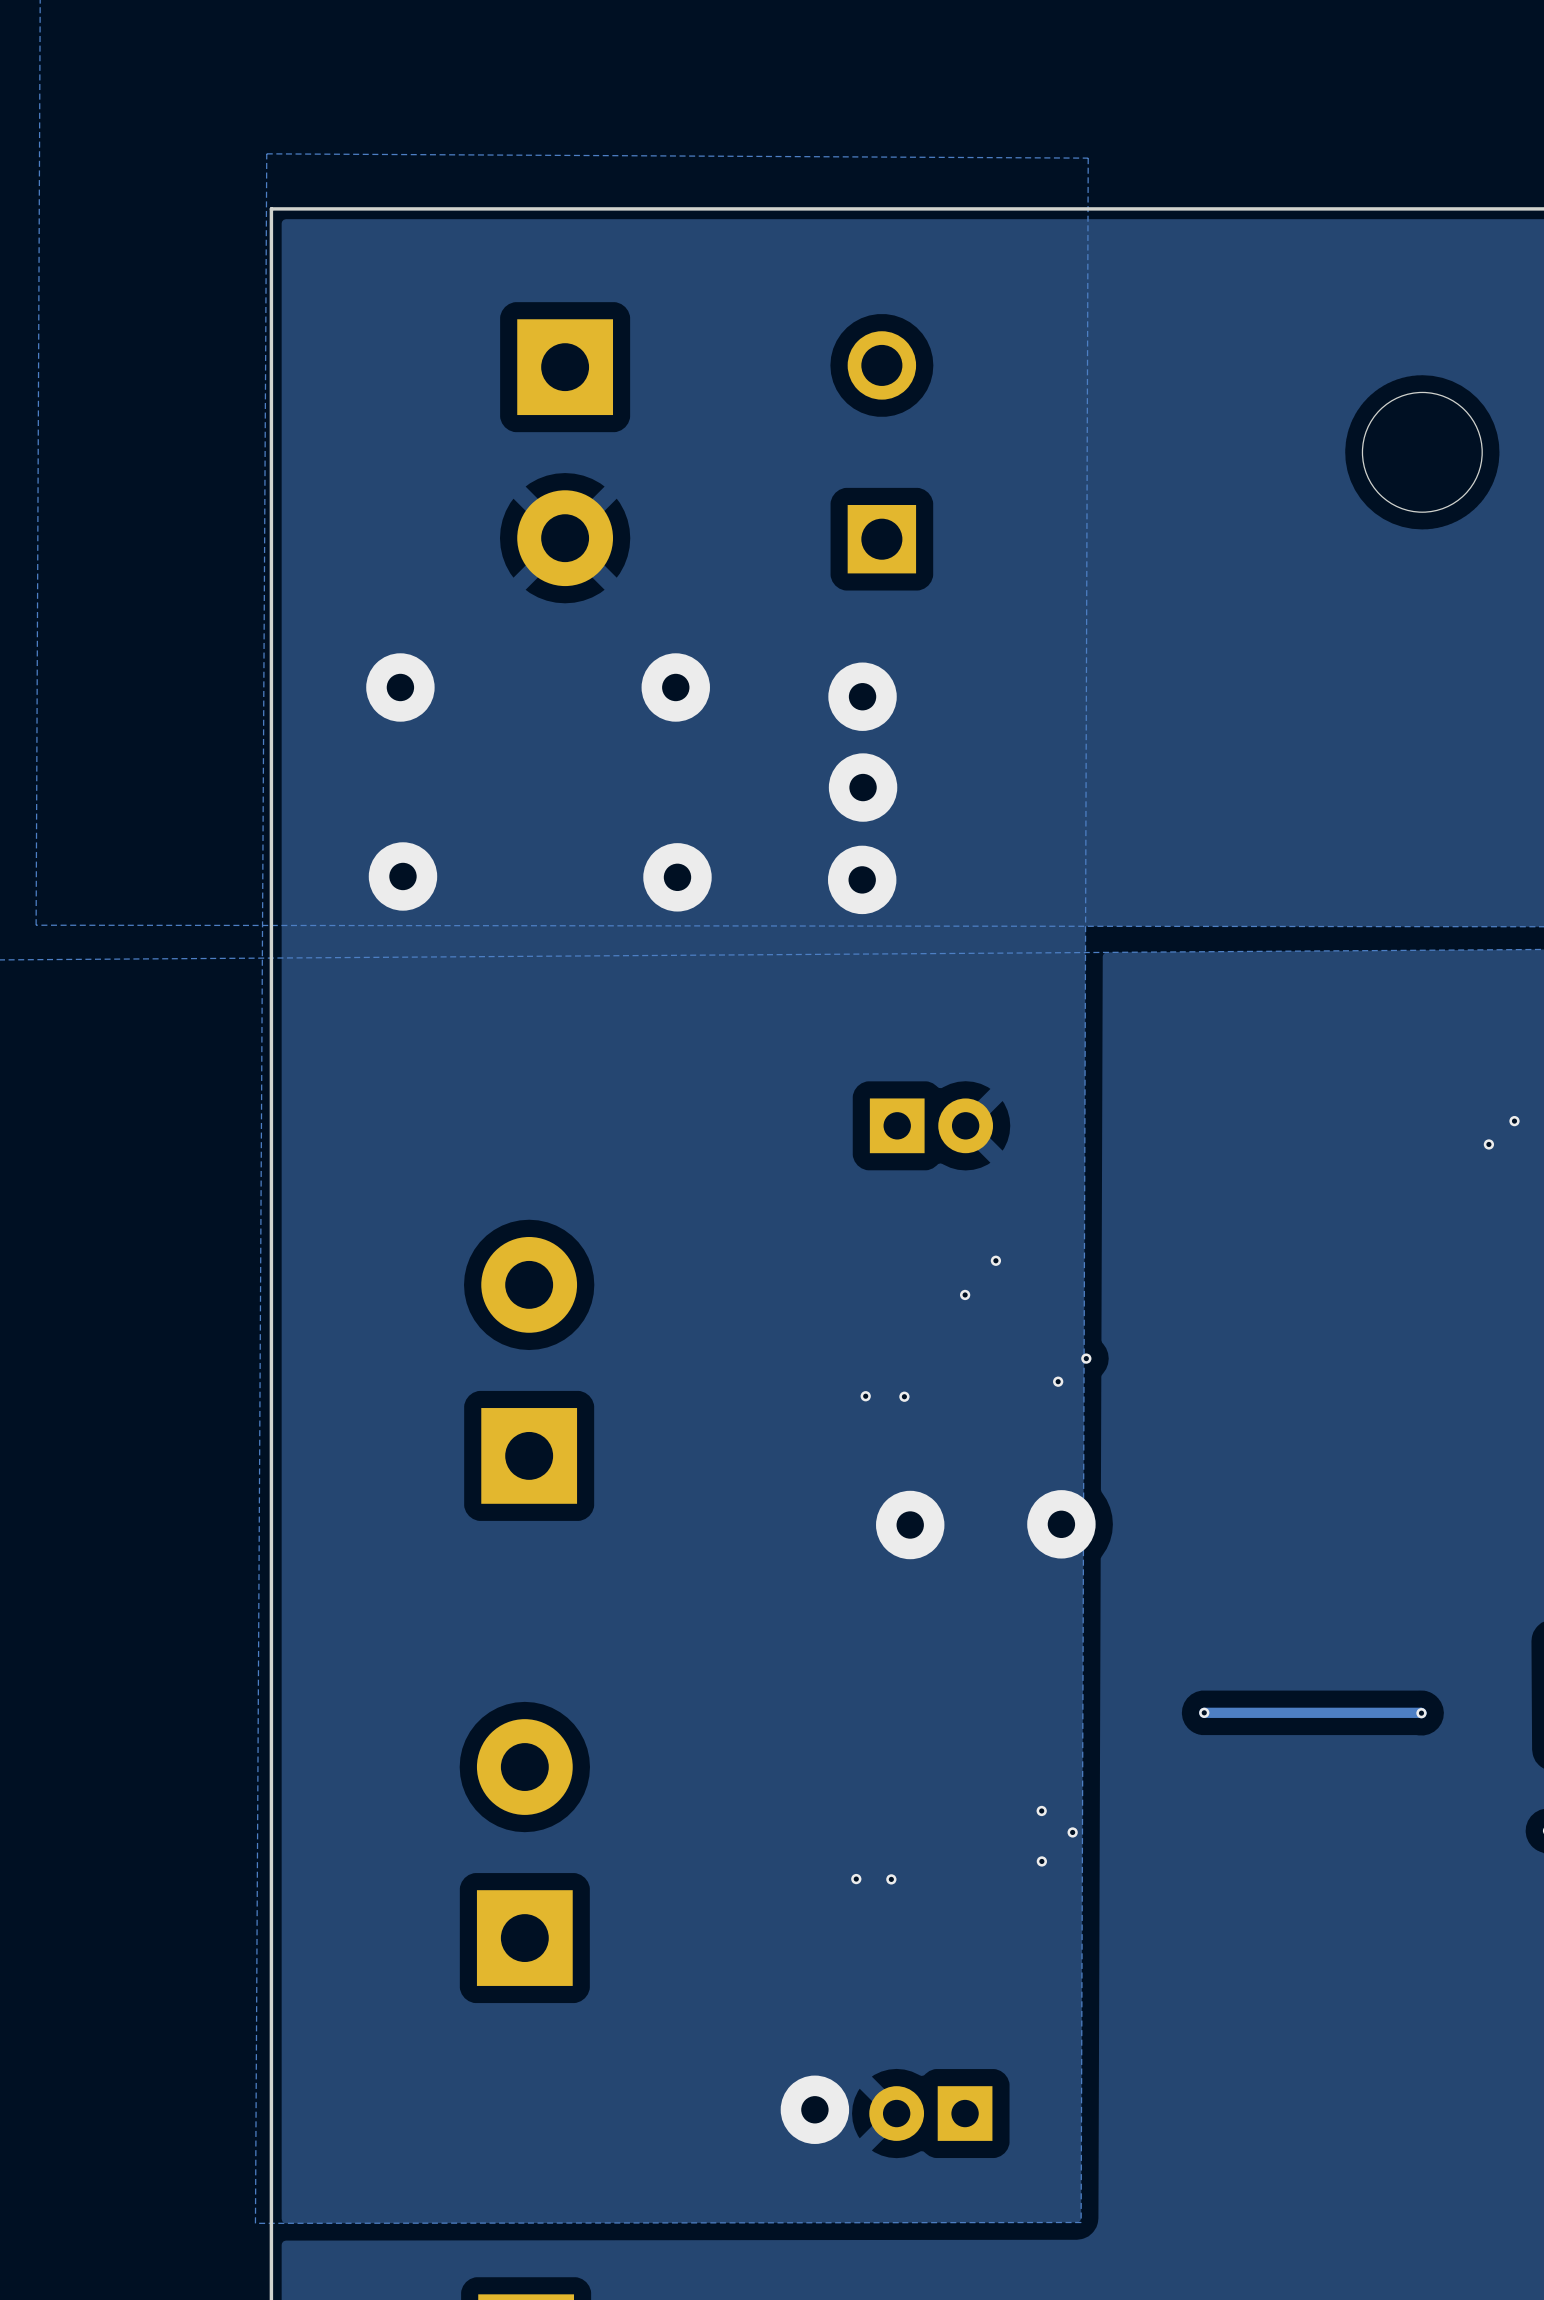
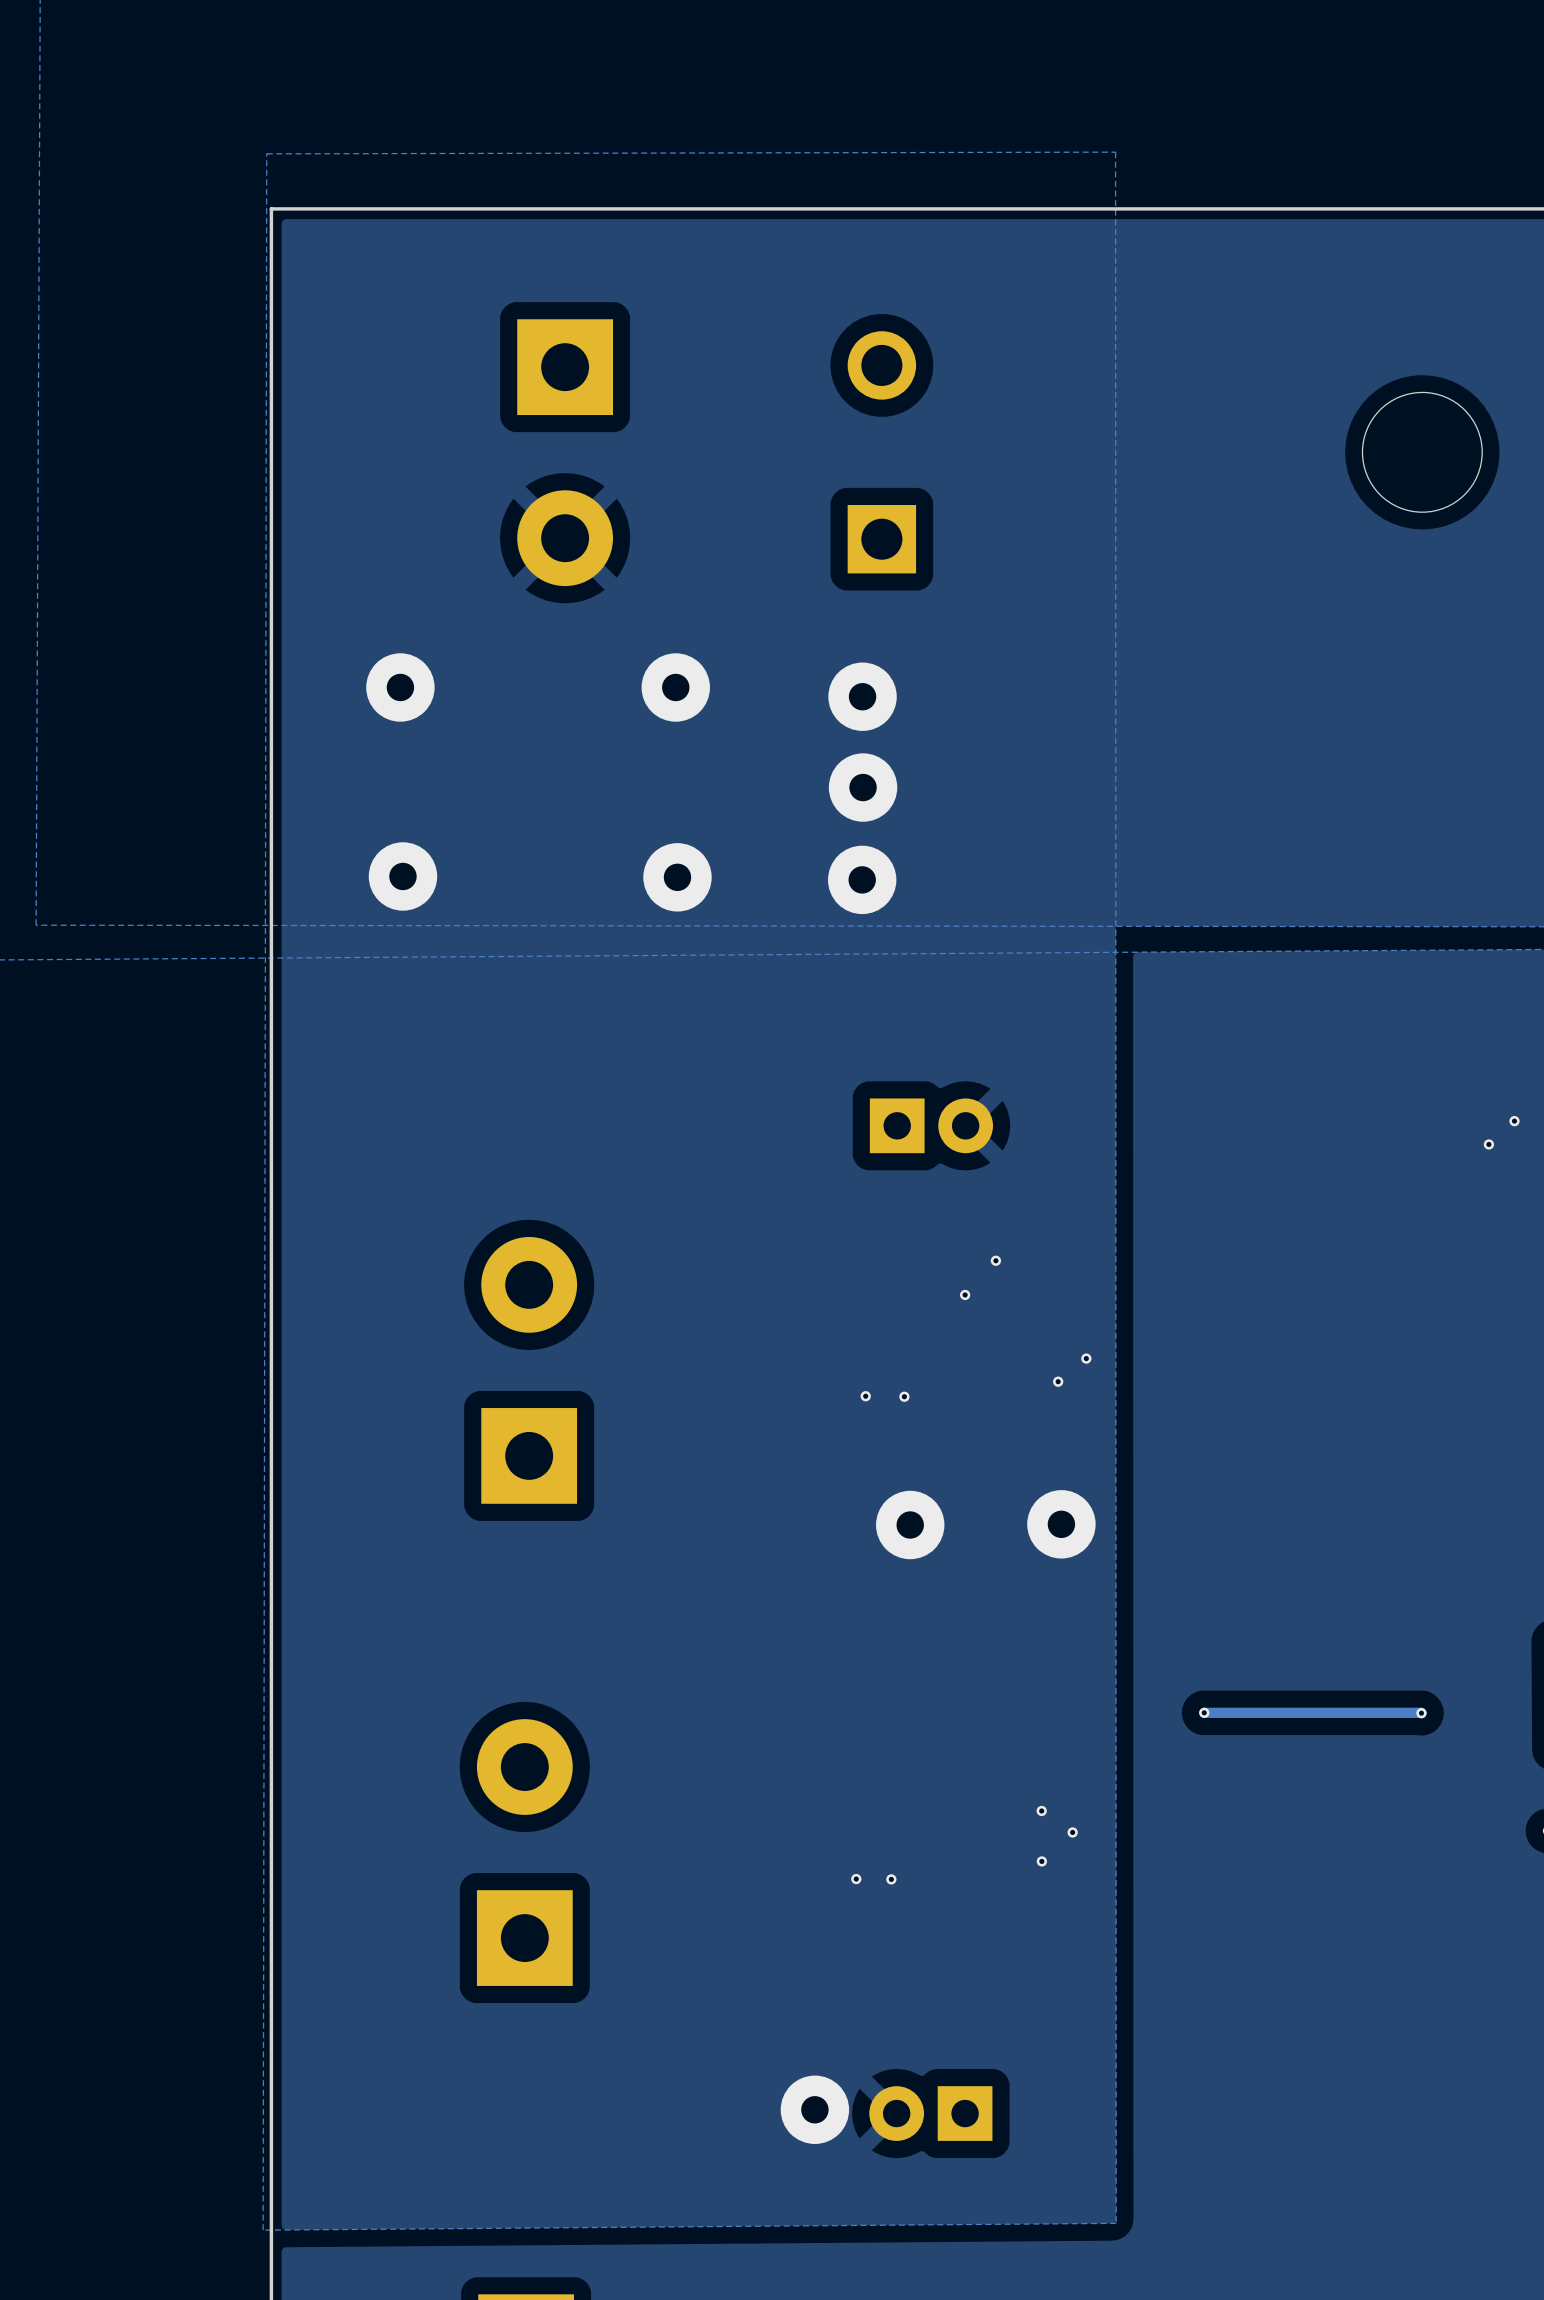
zone outline: (266, 153) (1088, 158) (1081, 2222) (255, 2223) (266, 153) -> (1115, 152) (1116, 2223) (263, 2230) (266, 153) (1115, 152)

